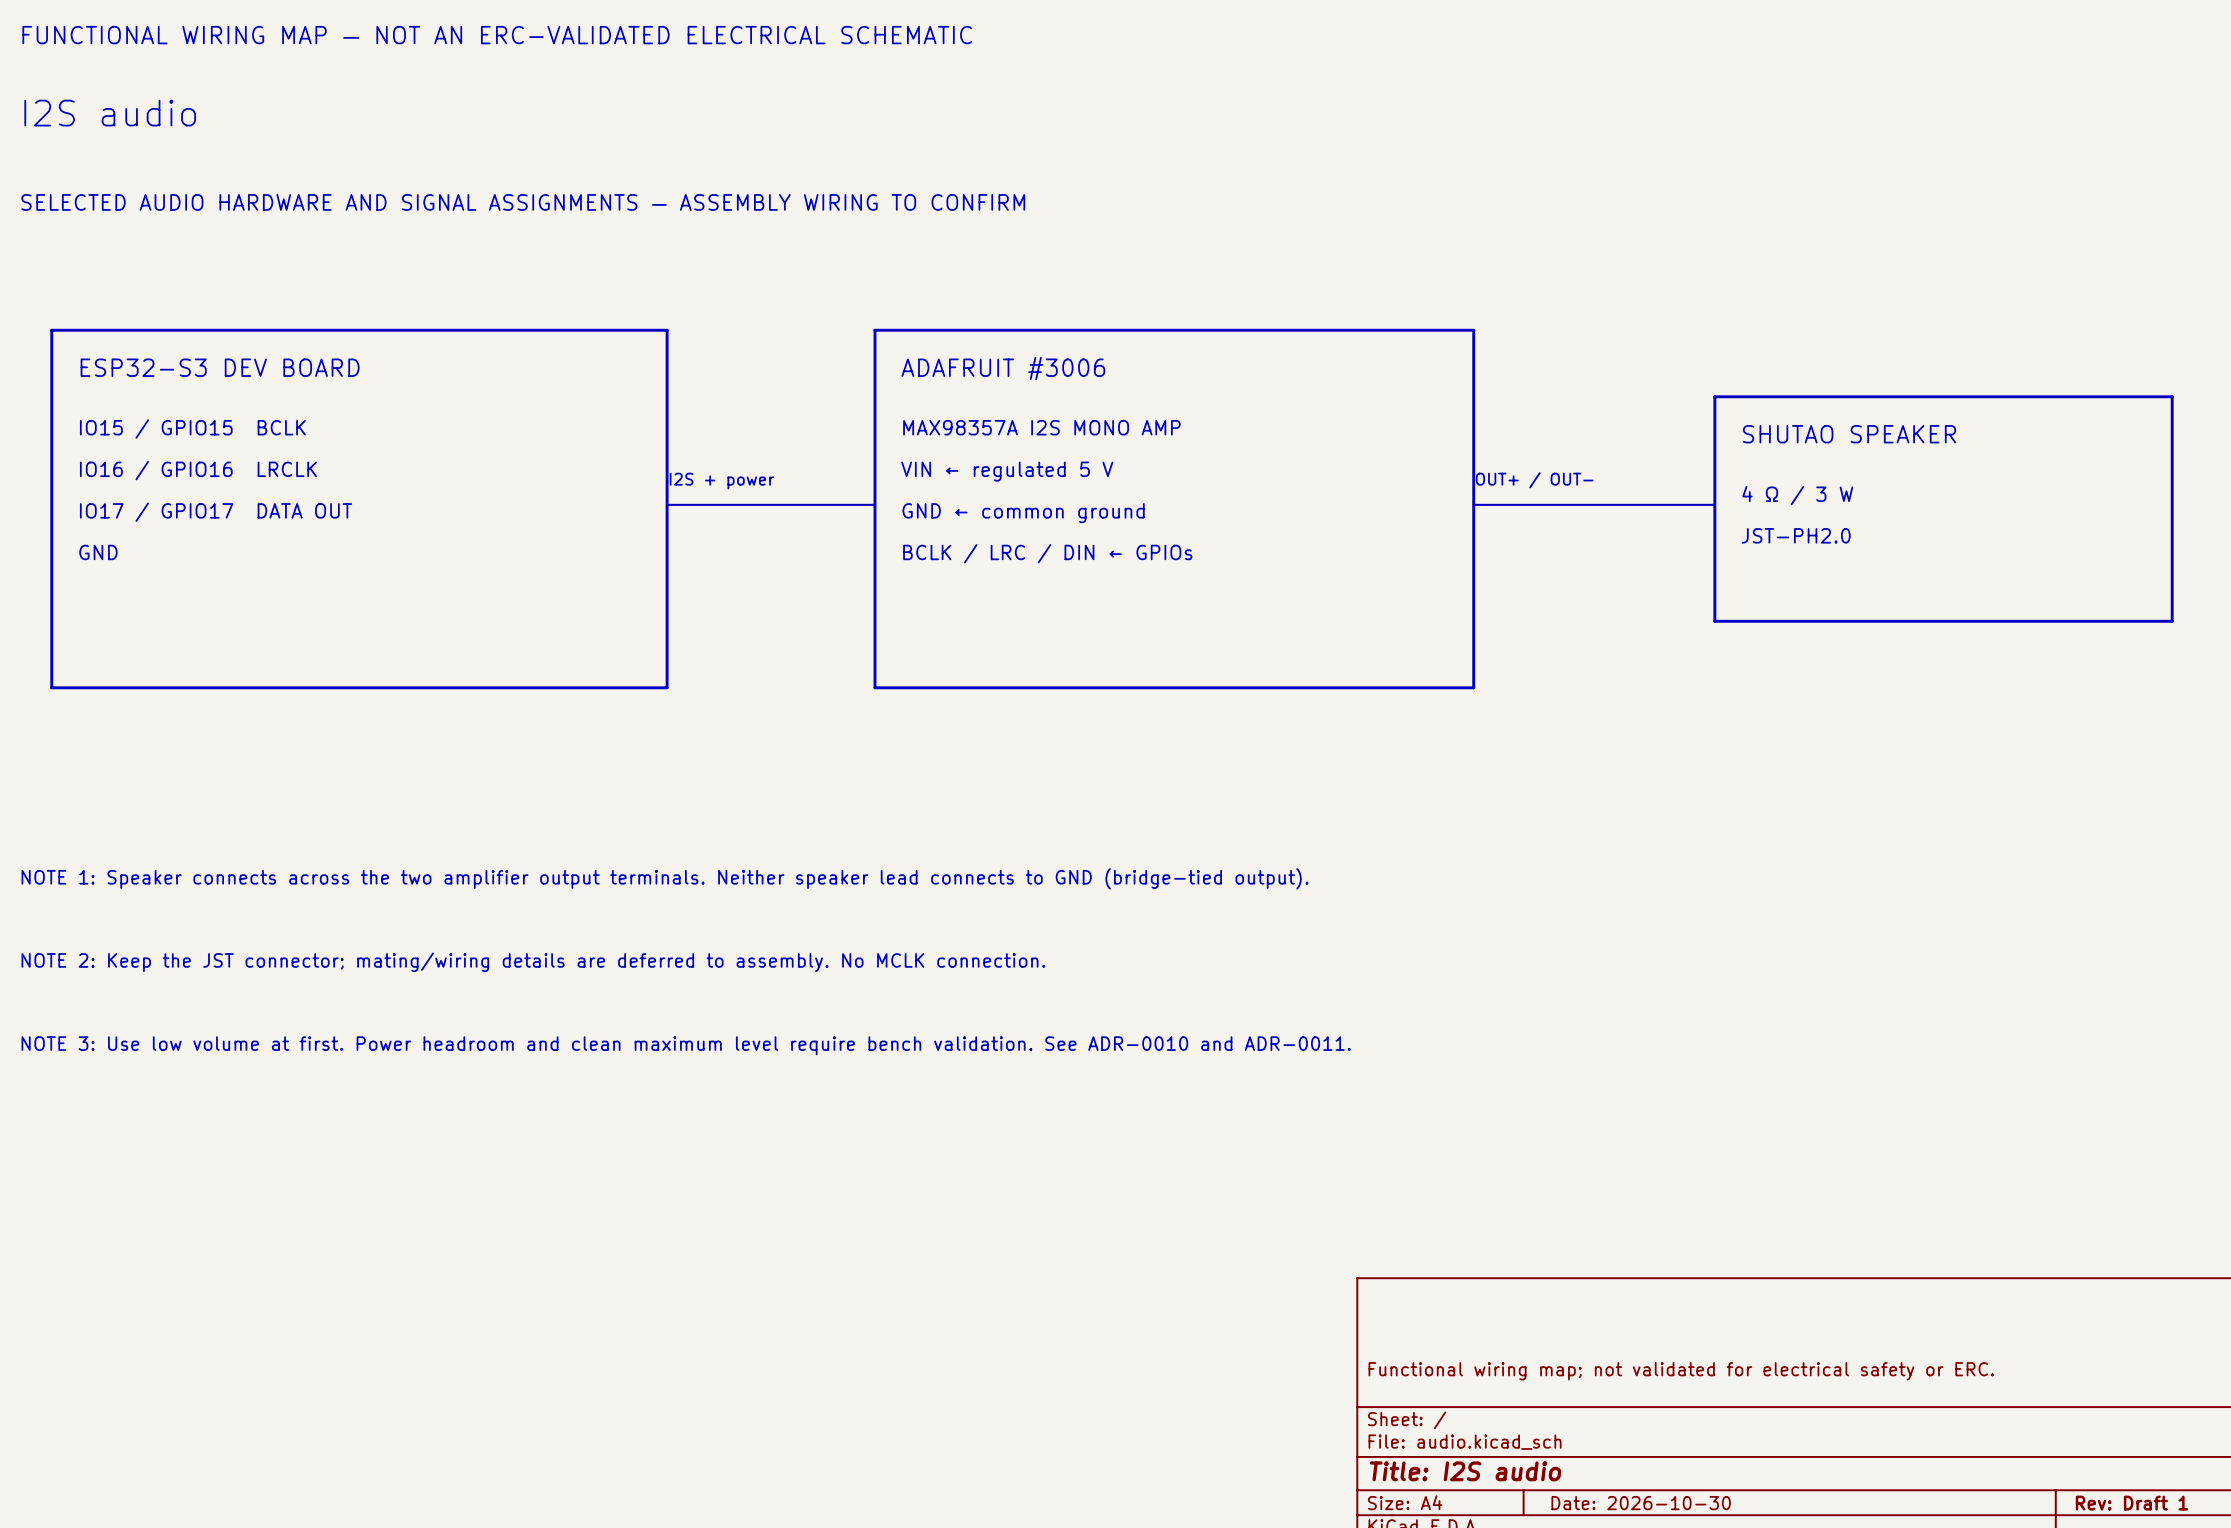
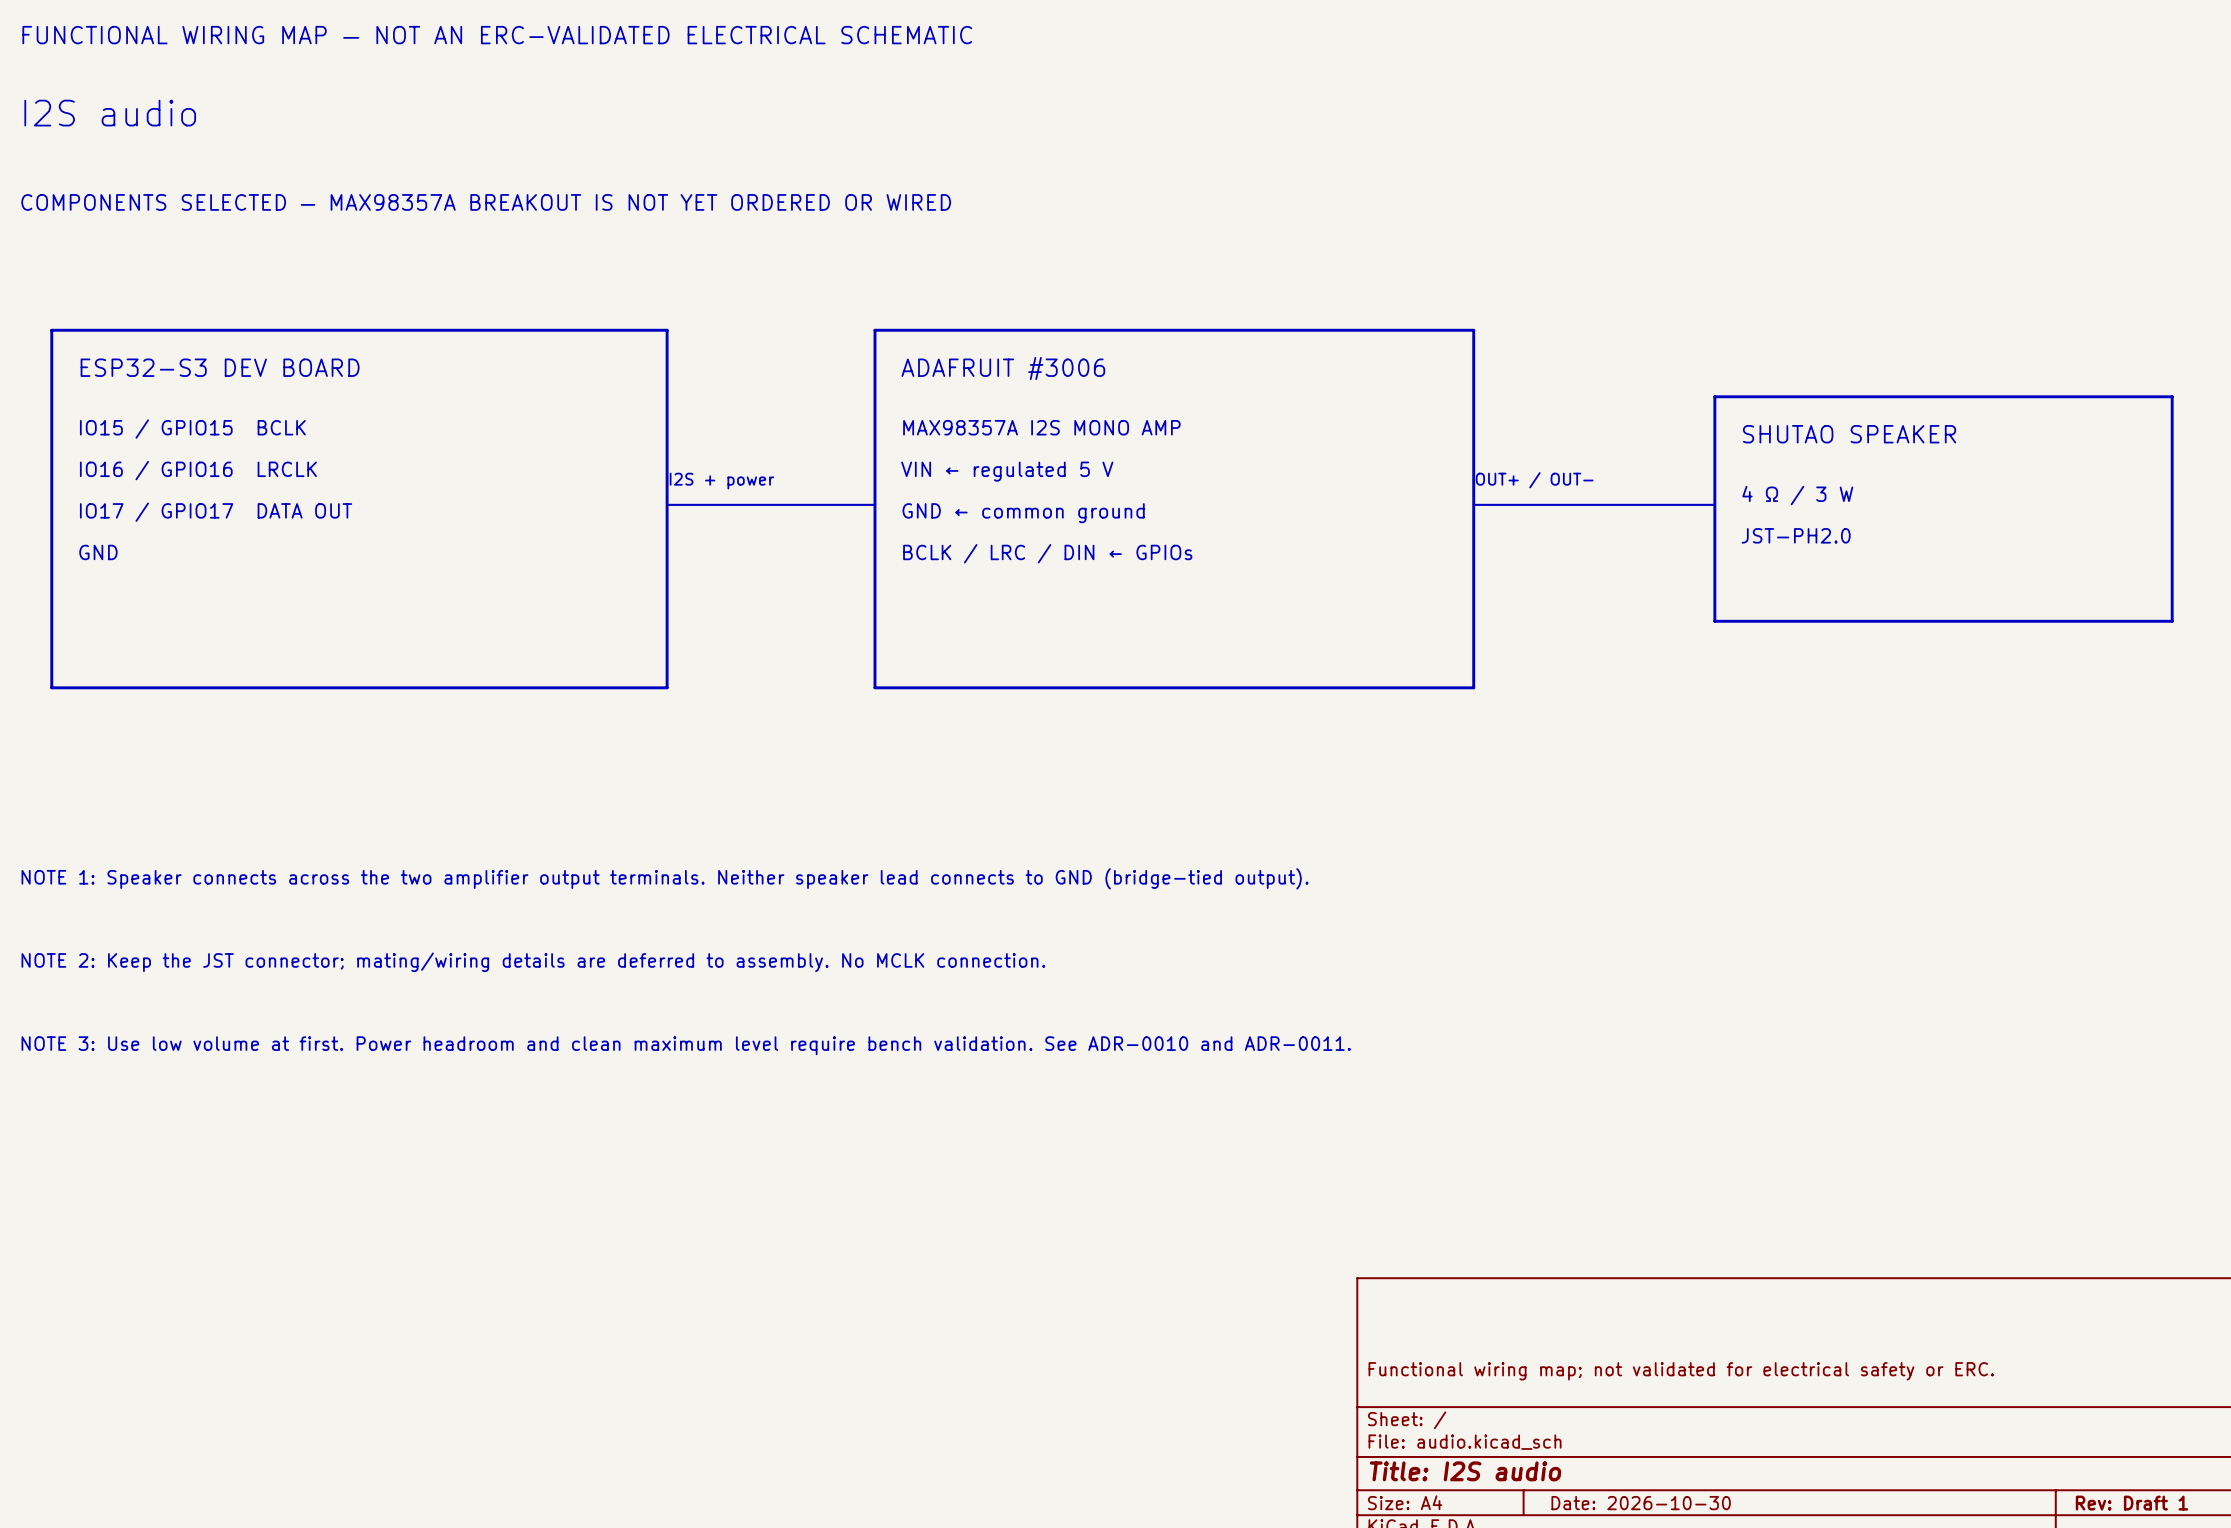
text: SELECTED AUDIO HARDWARE AND SIGNAL ASSIGNMENTS — ASSEMBLY WIRING TO CONFIRM (523, 202) -> COMPONENTS SELECTED — MAX98357A BREAKOUT IS NOT YET ORDERED OR WIRED (486, 202)

